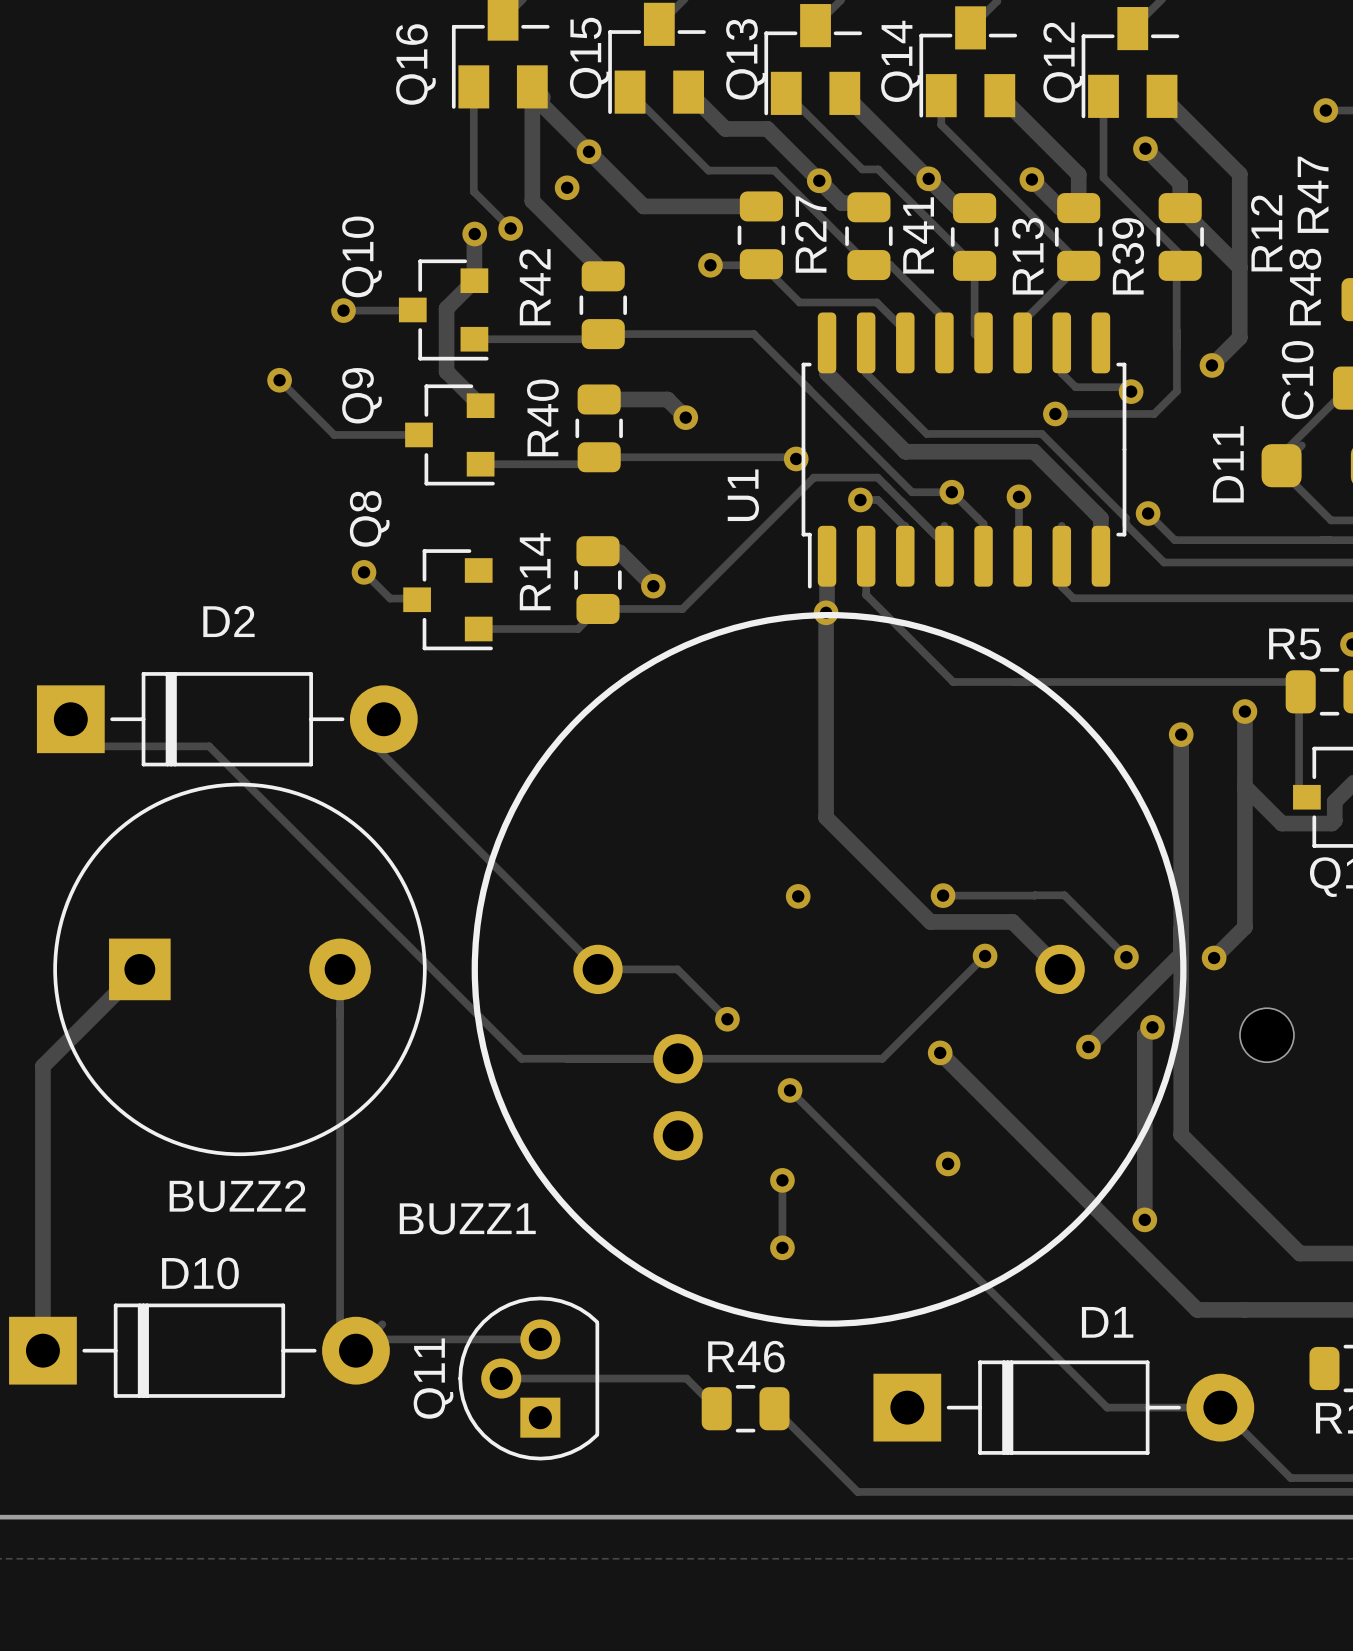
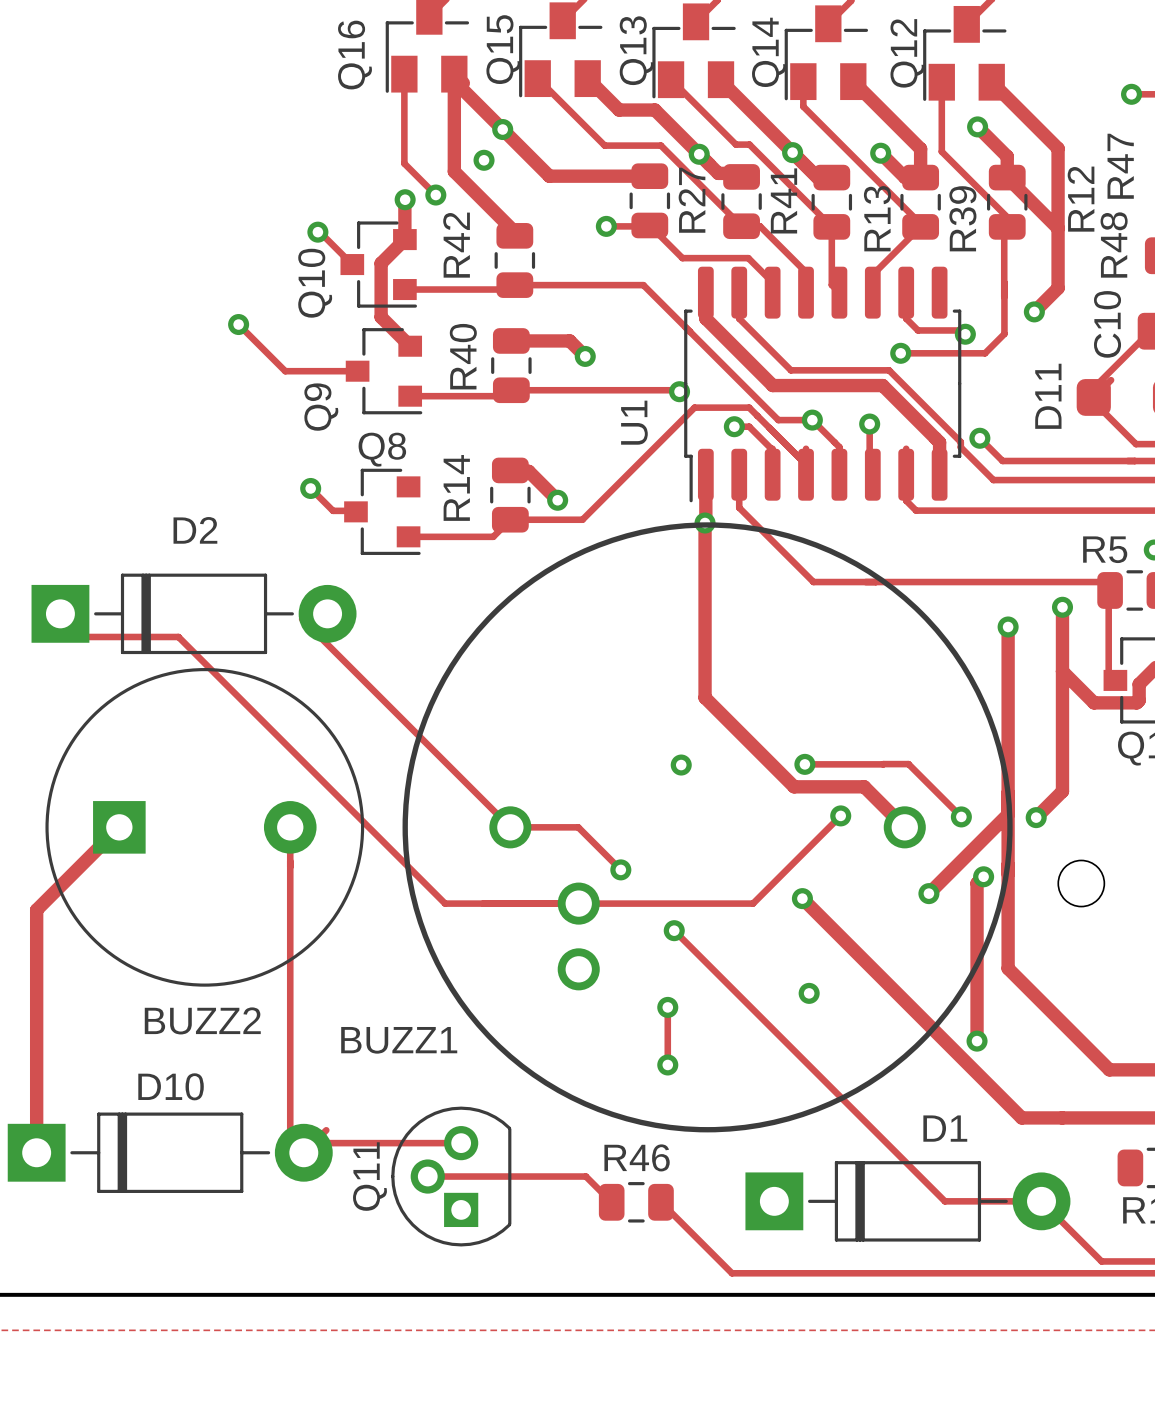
Q10 name position: Q10 (362, 256) -> Q10 (315, 283)
track: (343, 310) (412, 310) -> (317, 232) (352, 264)
via position: (343, 310) -> (317, 232)
Q9 name position: Q9 (362, 395) -> Q9 (321, 407)
Q8 name rotation: 0° (369, 518) -> 90° clockwise (382, 449)
Q8 name position: Q8 (369, 518) -> Q8 (382, 449)

